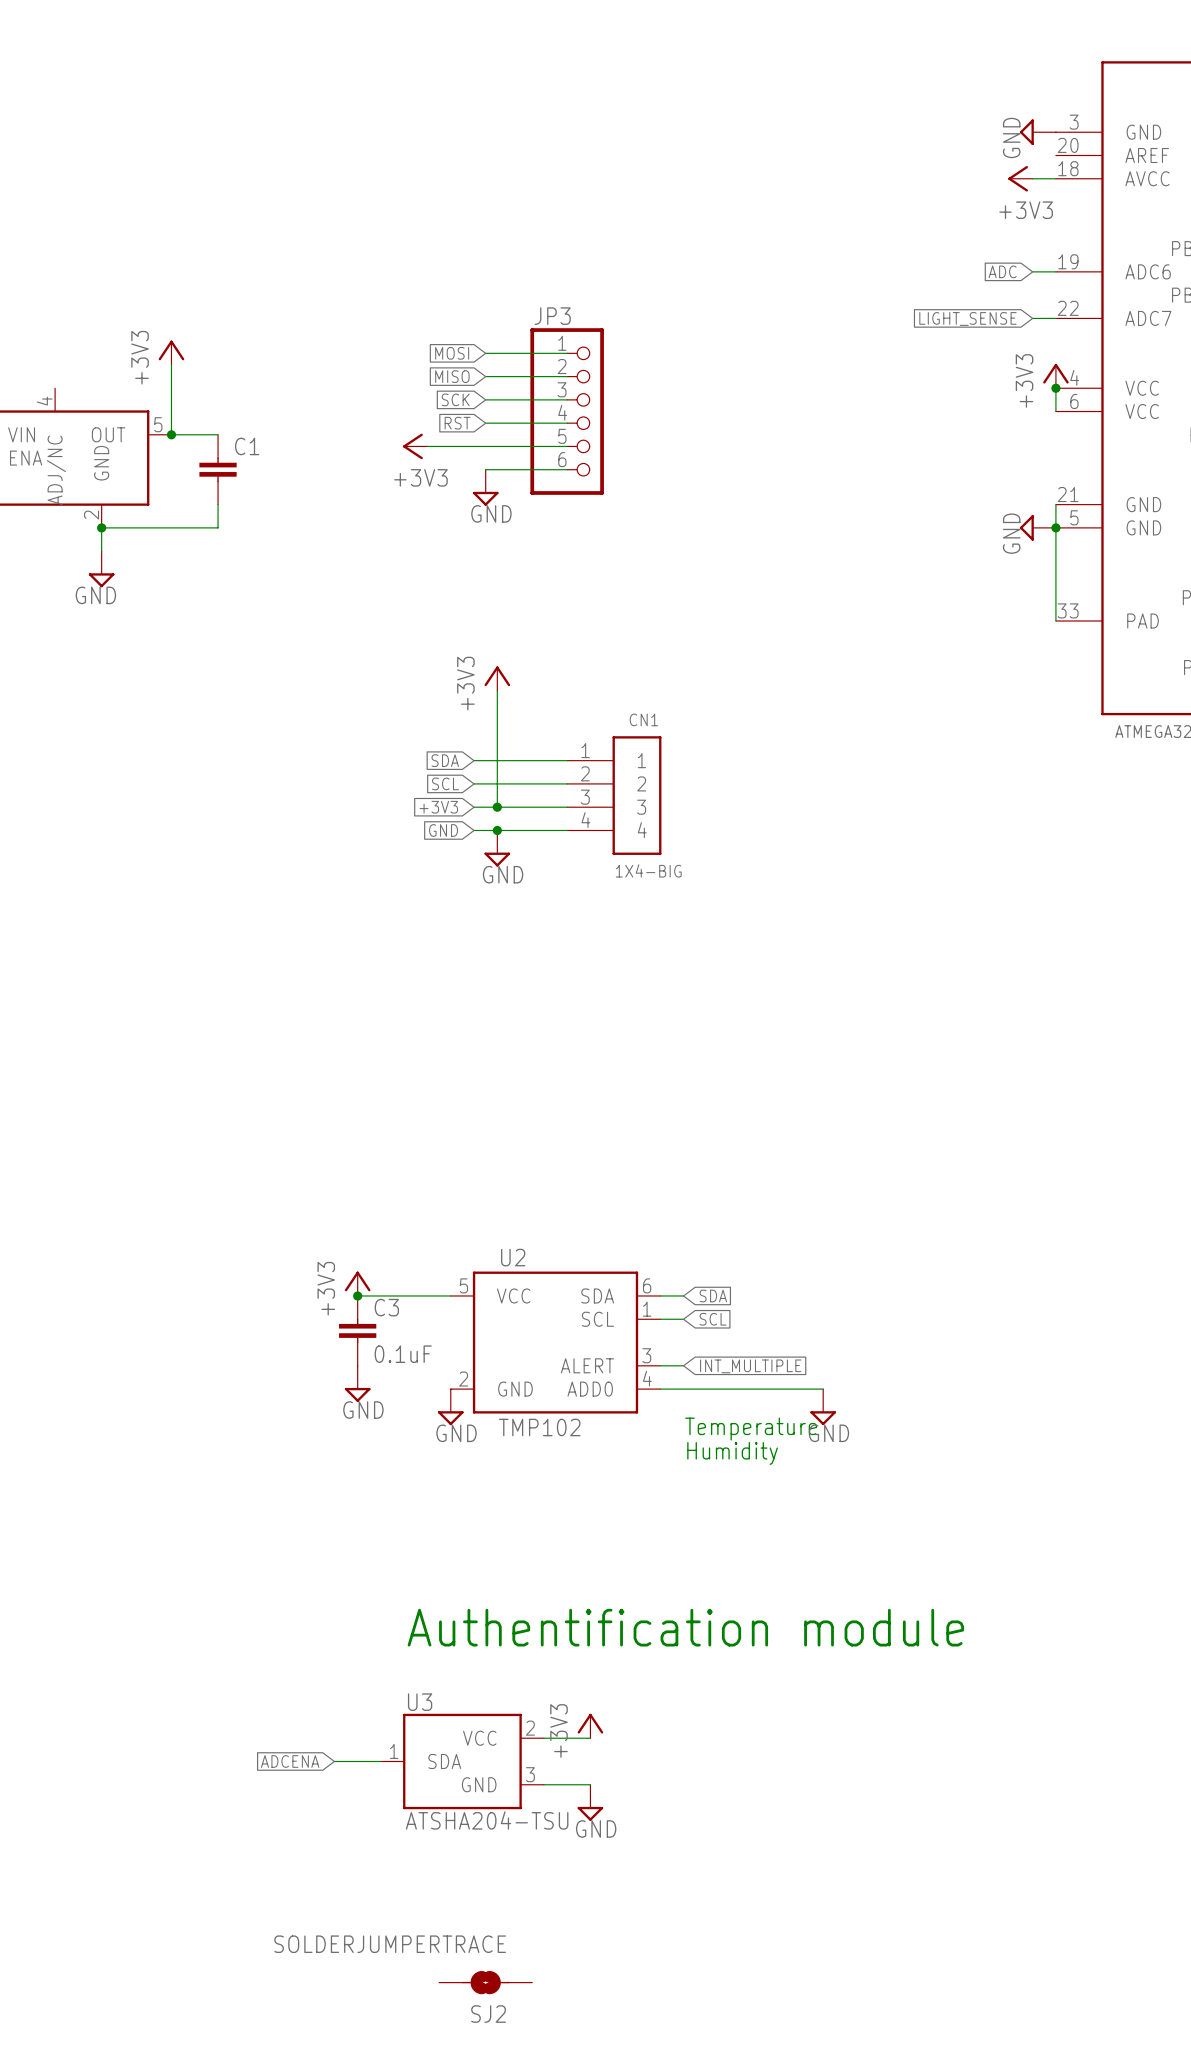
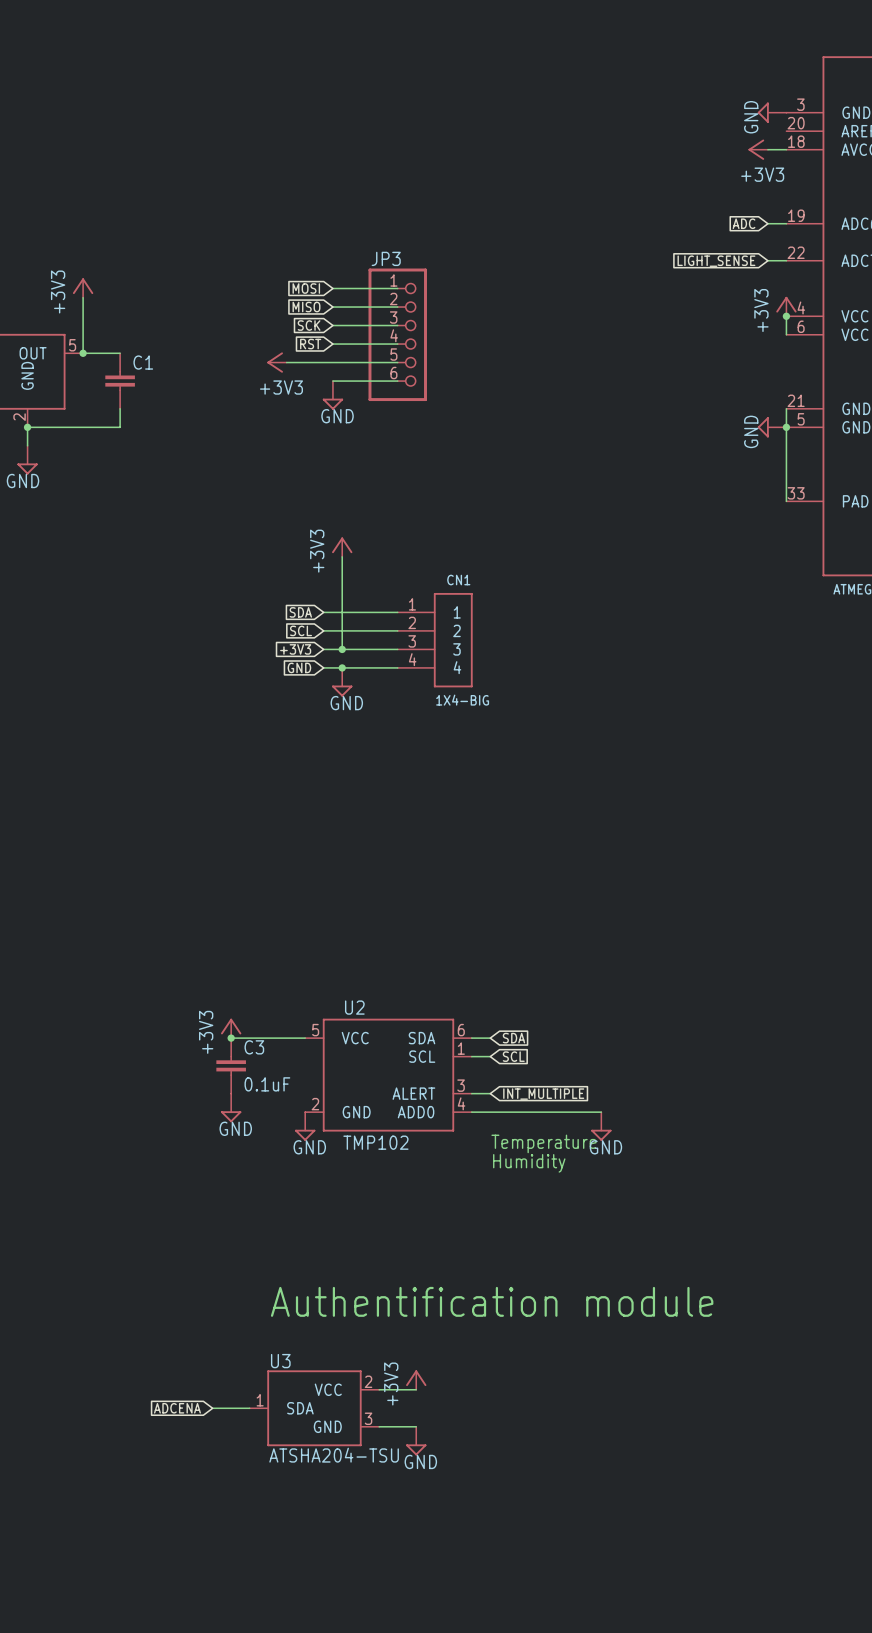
SJ2: SOLDERJUMPERTRACE (485, 1982) -> none

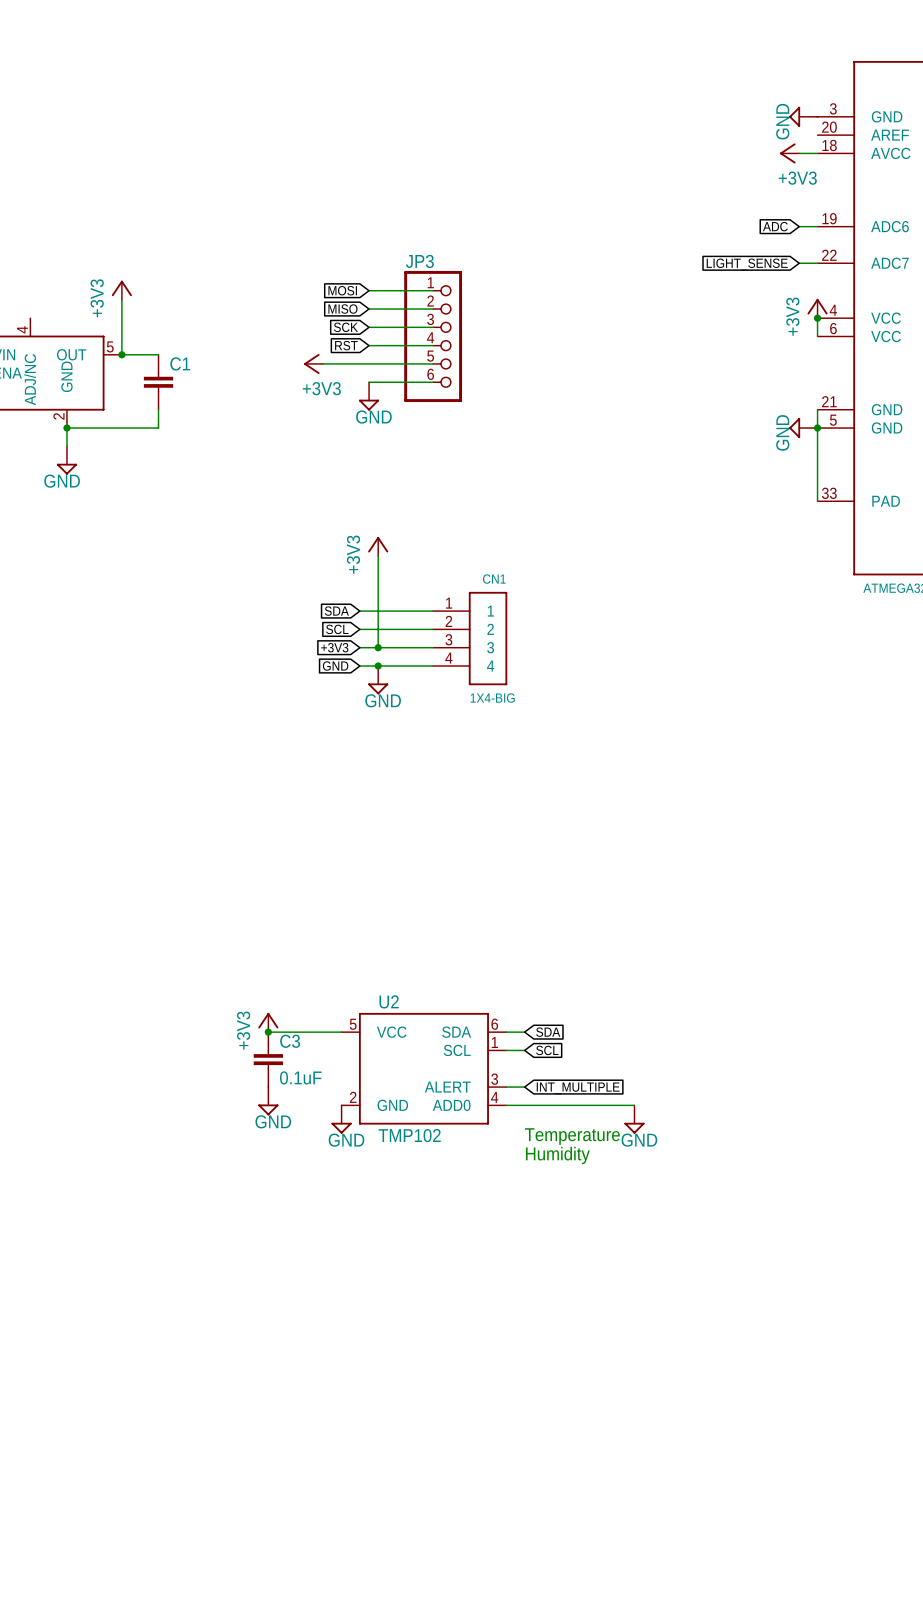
text: Authentification module (492, 1301) -> none
power symbol: +3V3 (416, 1380) -> none
wire: (379, 1389) (416, 1389) -> none
global label: ADCENA (177, 1408) -> none
wire: (212, 1408) (249, 1408) -> none
U3: ATSHA204-TSU (314, 1408) -> none
wire: (379, 1426) (416, 1426) -> none
power symbol: GND (416, 1441) -> none

